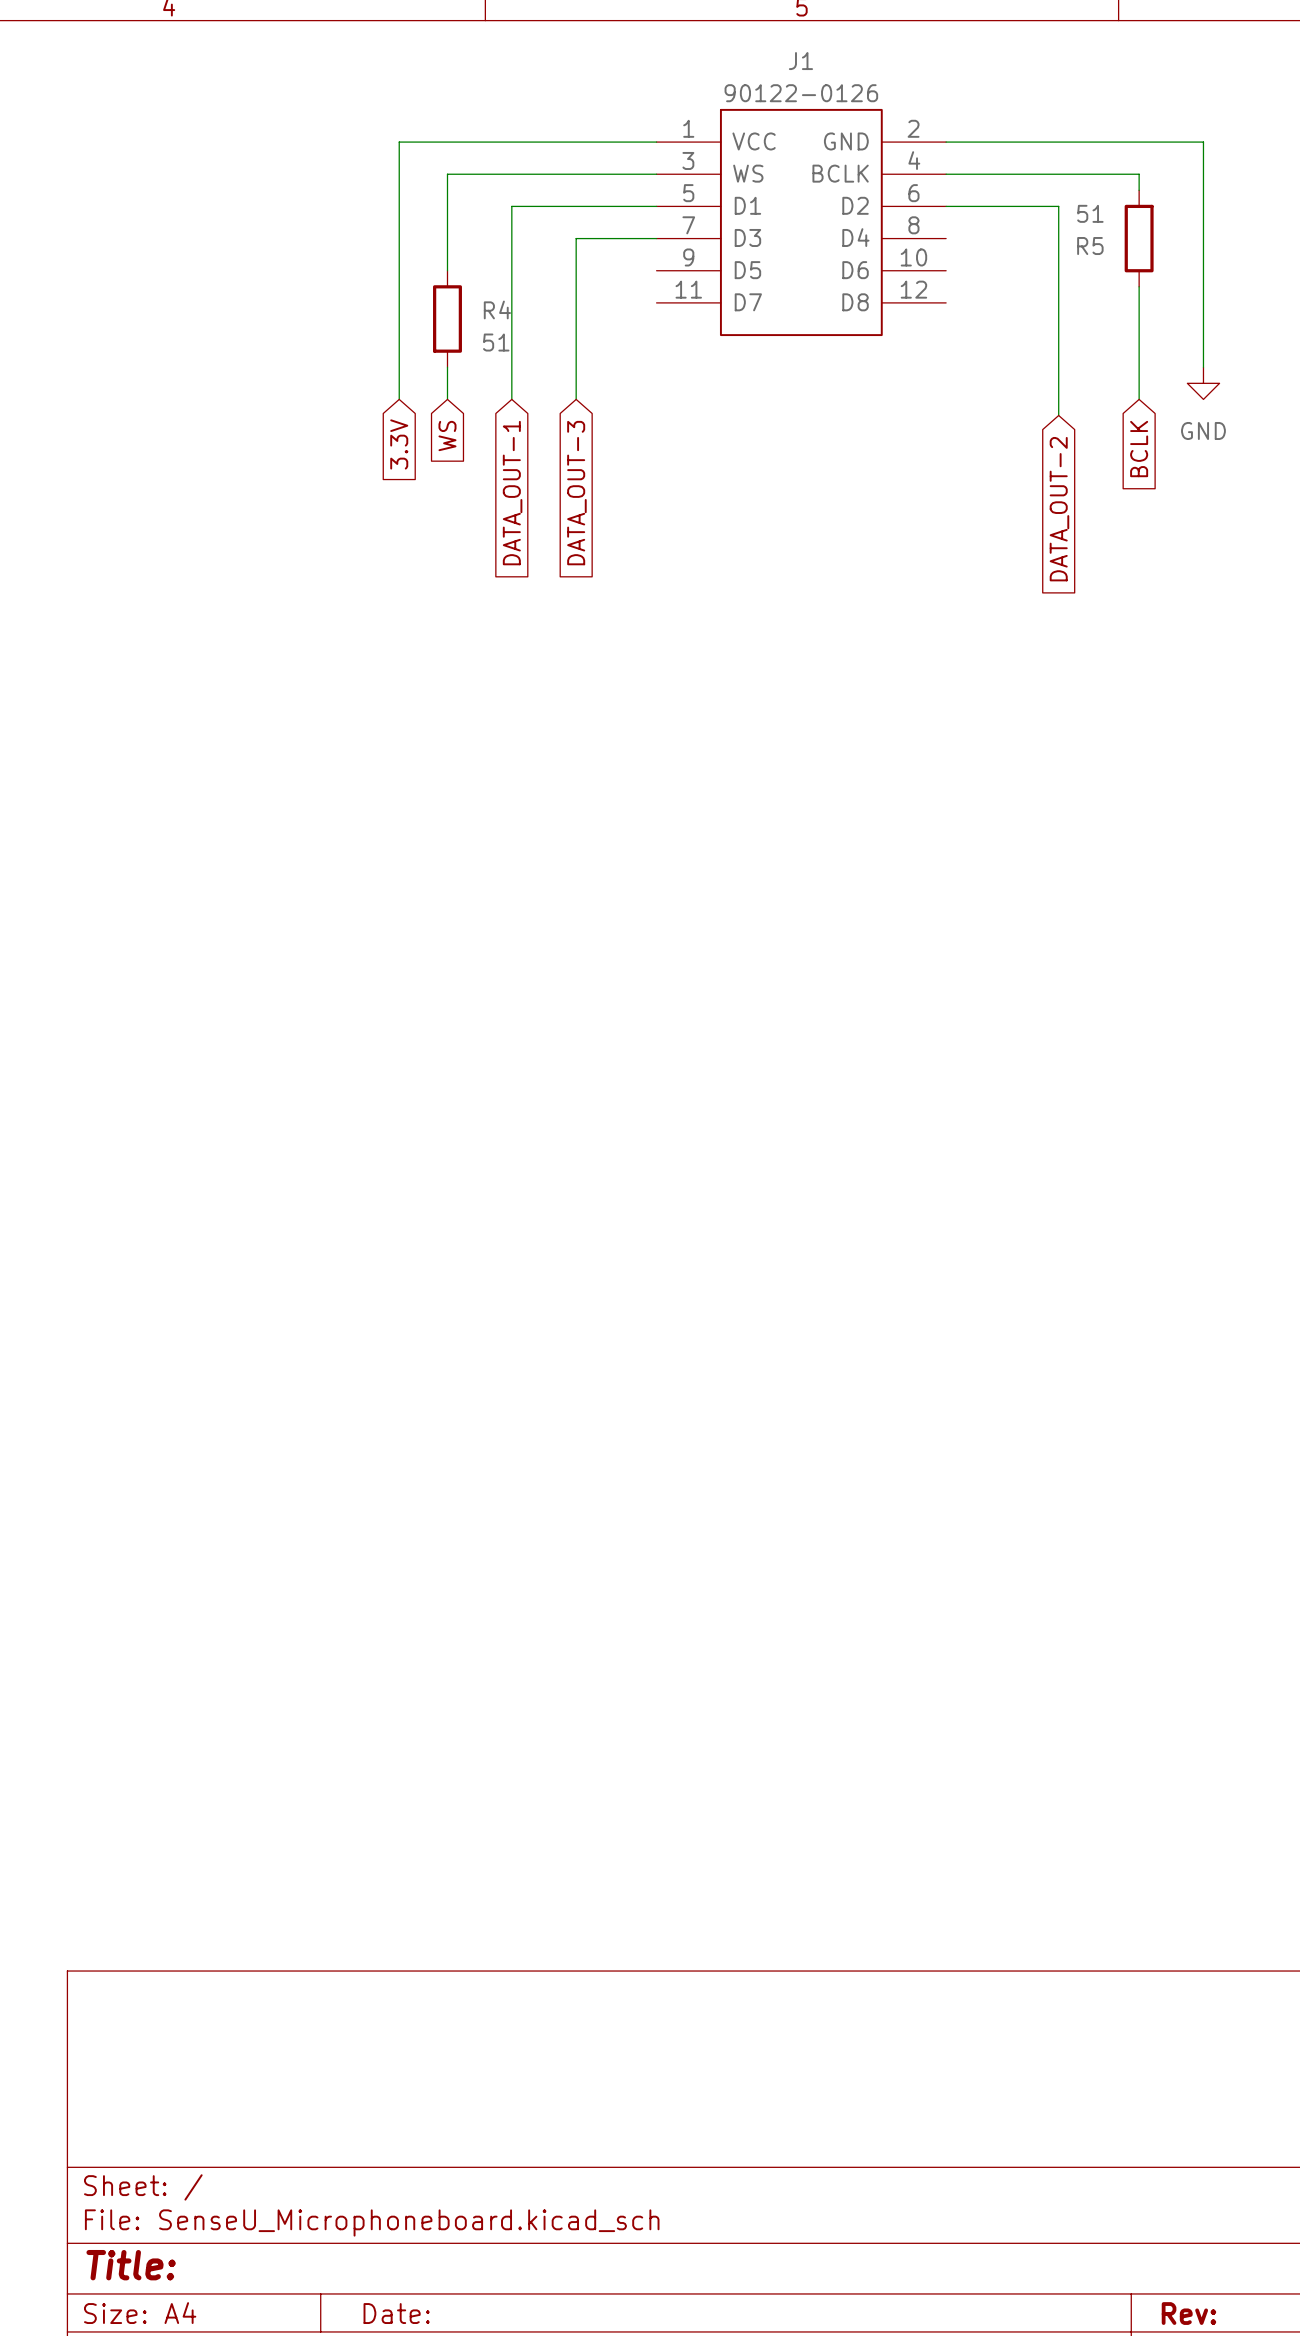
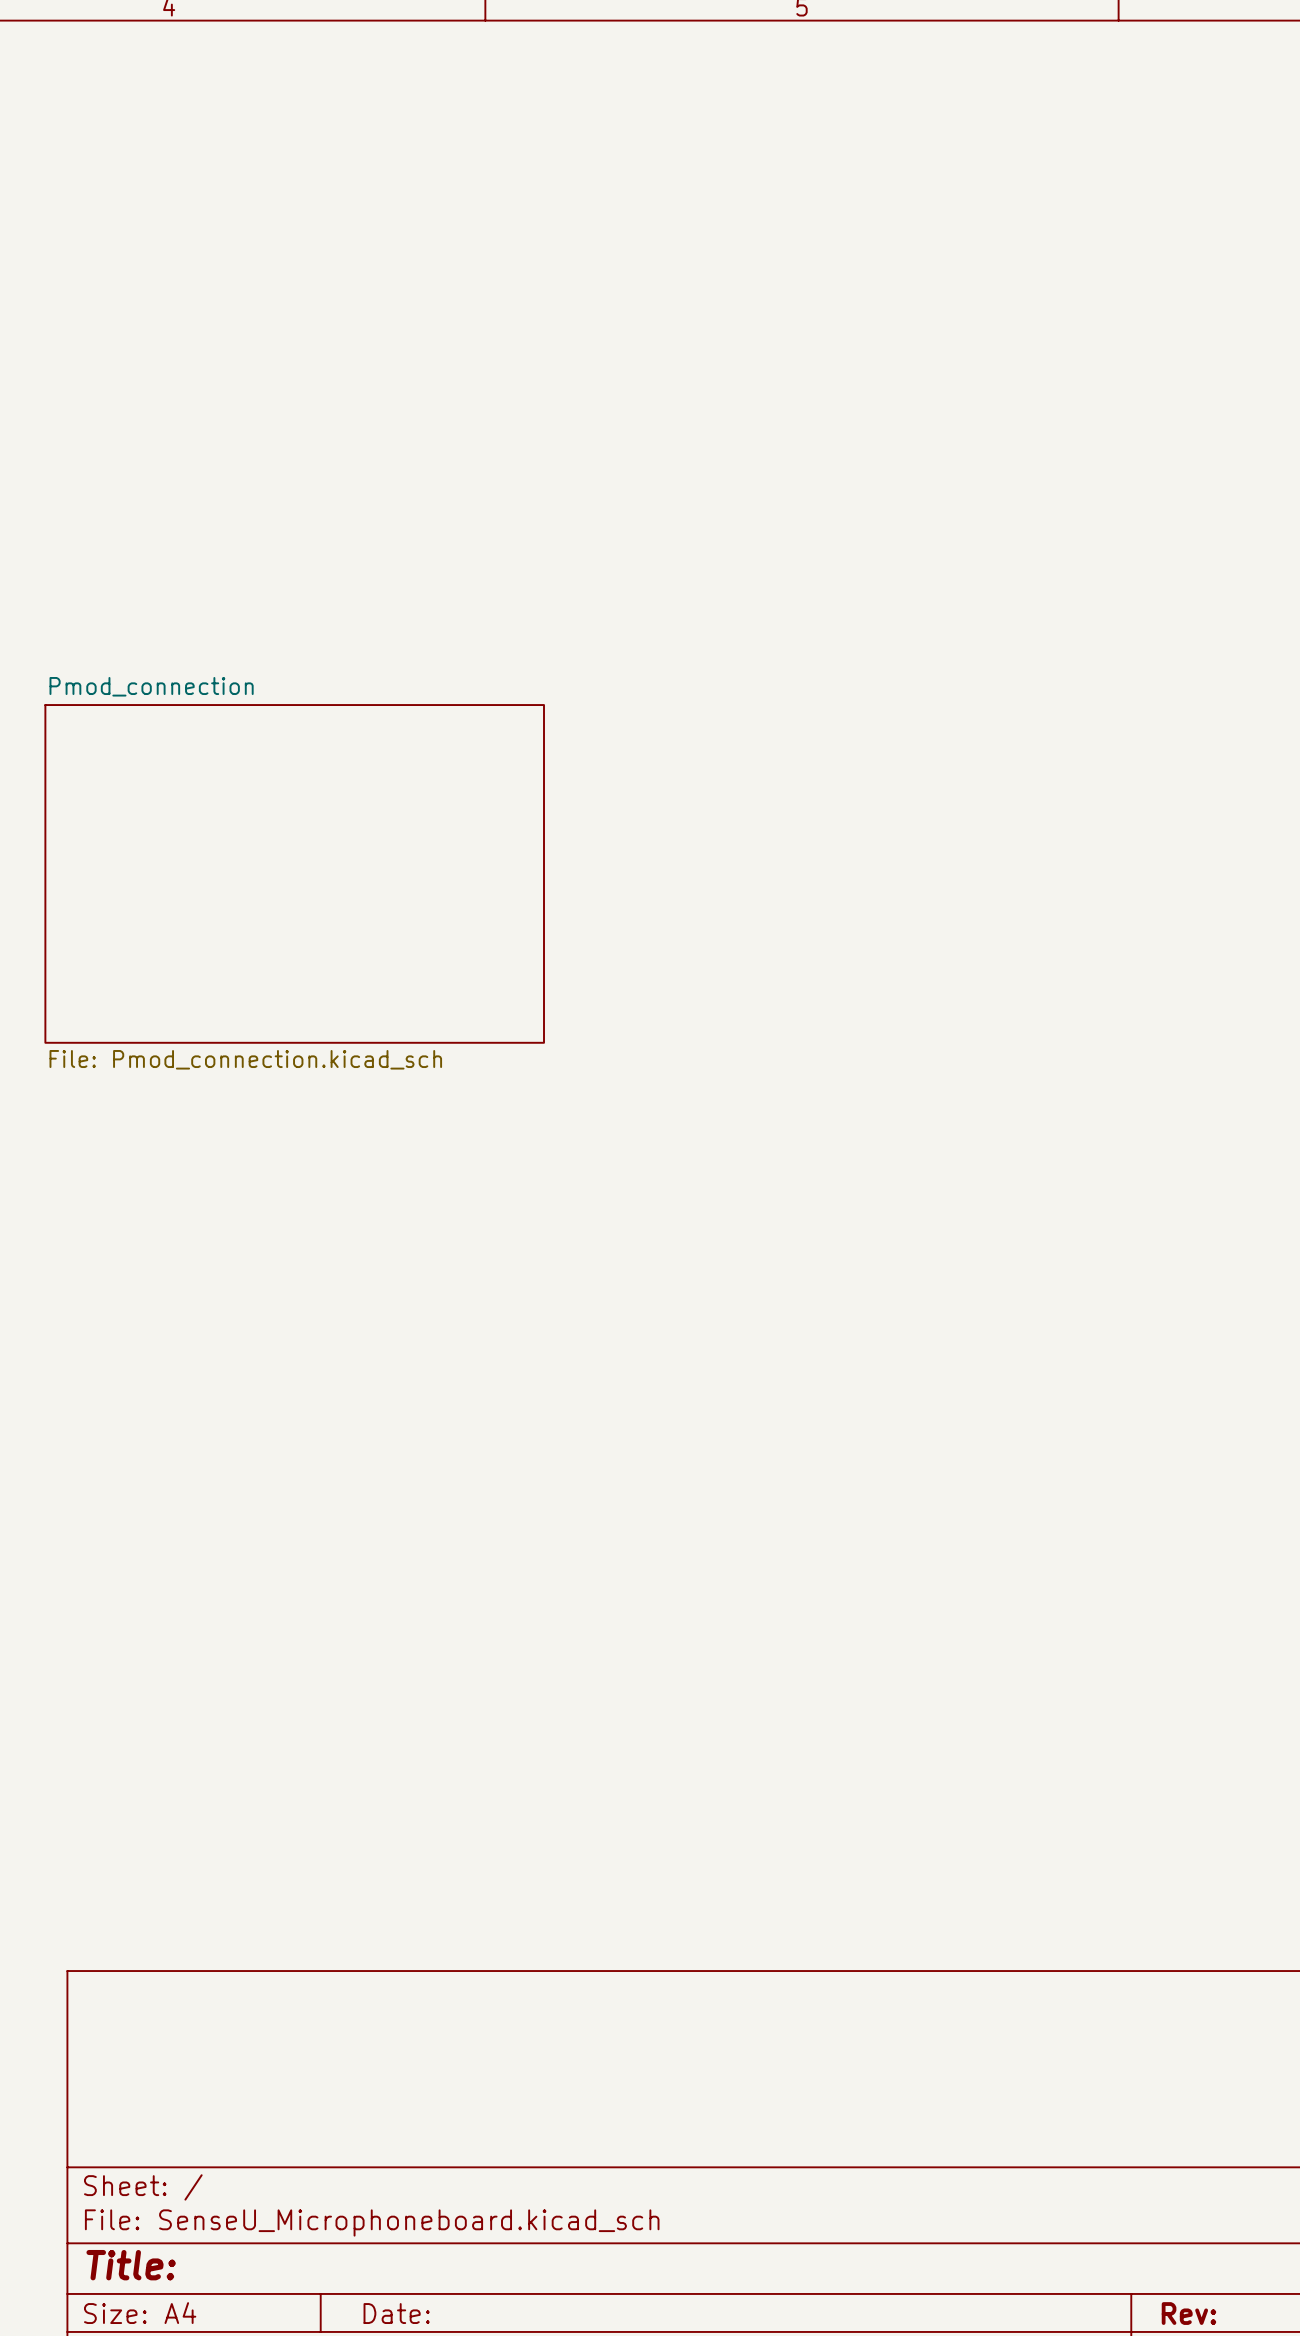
wire: (656, 142) (399, 142) (399, 399) -> none
wire: (946, 142) (1203, 142) (1203, 367) -> none
wire: (656, 174) (447, 174) (447, 270) -> none
wire: (946, 174) (1139, 174) (1139, 190) -> none
wire: (656, 206) (511, 206) (511, 399) -> none
wire: (946, 206) (1058, 206) (1058, 415) -> none
J1: 90122-0126 (801, 222) -> none
wire: (656, 238) (576, 238) (576, 399) -> none
R5: 51 (1139, 238) -> none
wire: (1139, 286) (1139, 399) -> none
R4: 51 (447, 318) -> none
wire: (447, 367) (447, 399) -> none
power symbol: GND (1203, 383) -> none
global label: WS (447, 436) -> none
global label: 3.3V (399, 444) -> none
global label: BCLK (1139, 449) -> none
global label: DATA_OUT-1 (512, 493) -> none
global label: DATA_OUT-3 (576, 493) -> none
global label: DATA_OUT-2 (1059, 509) -> none
sheet Pmod_connection: none -> File: Pmod_connection.kicad_sch (294, 873)

